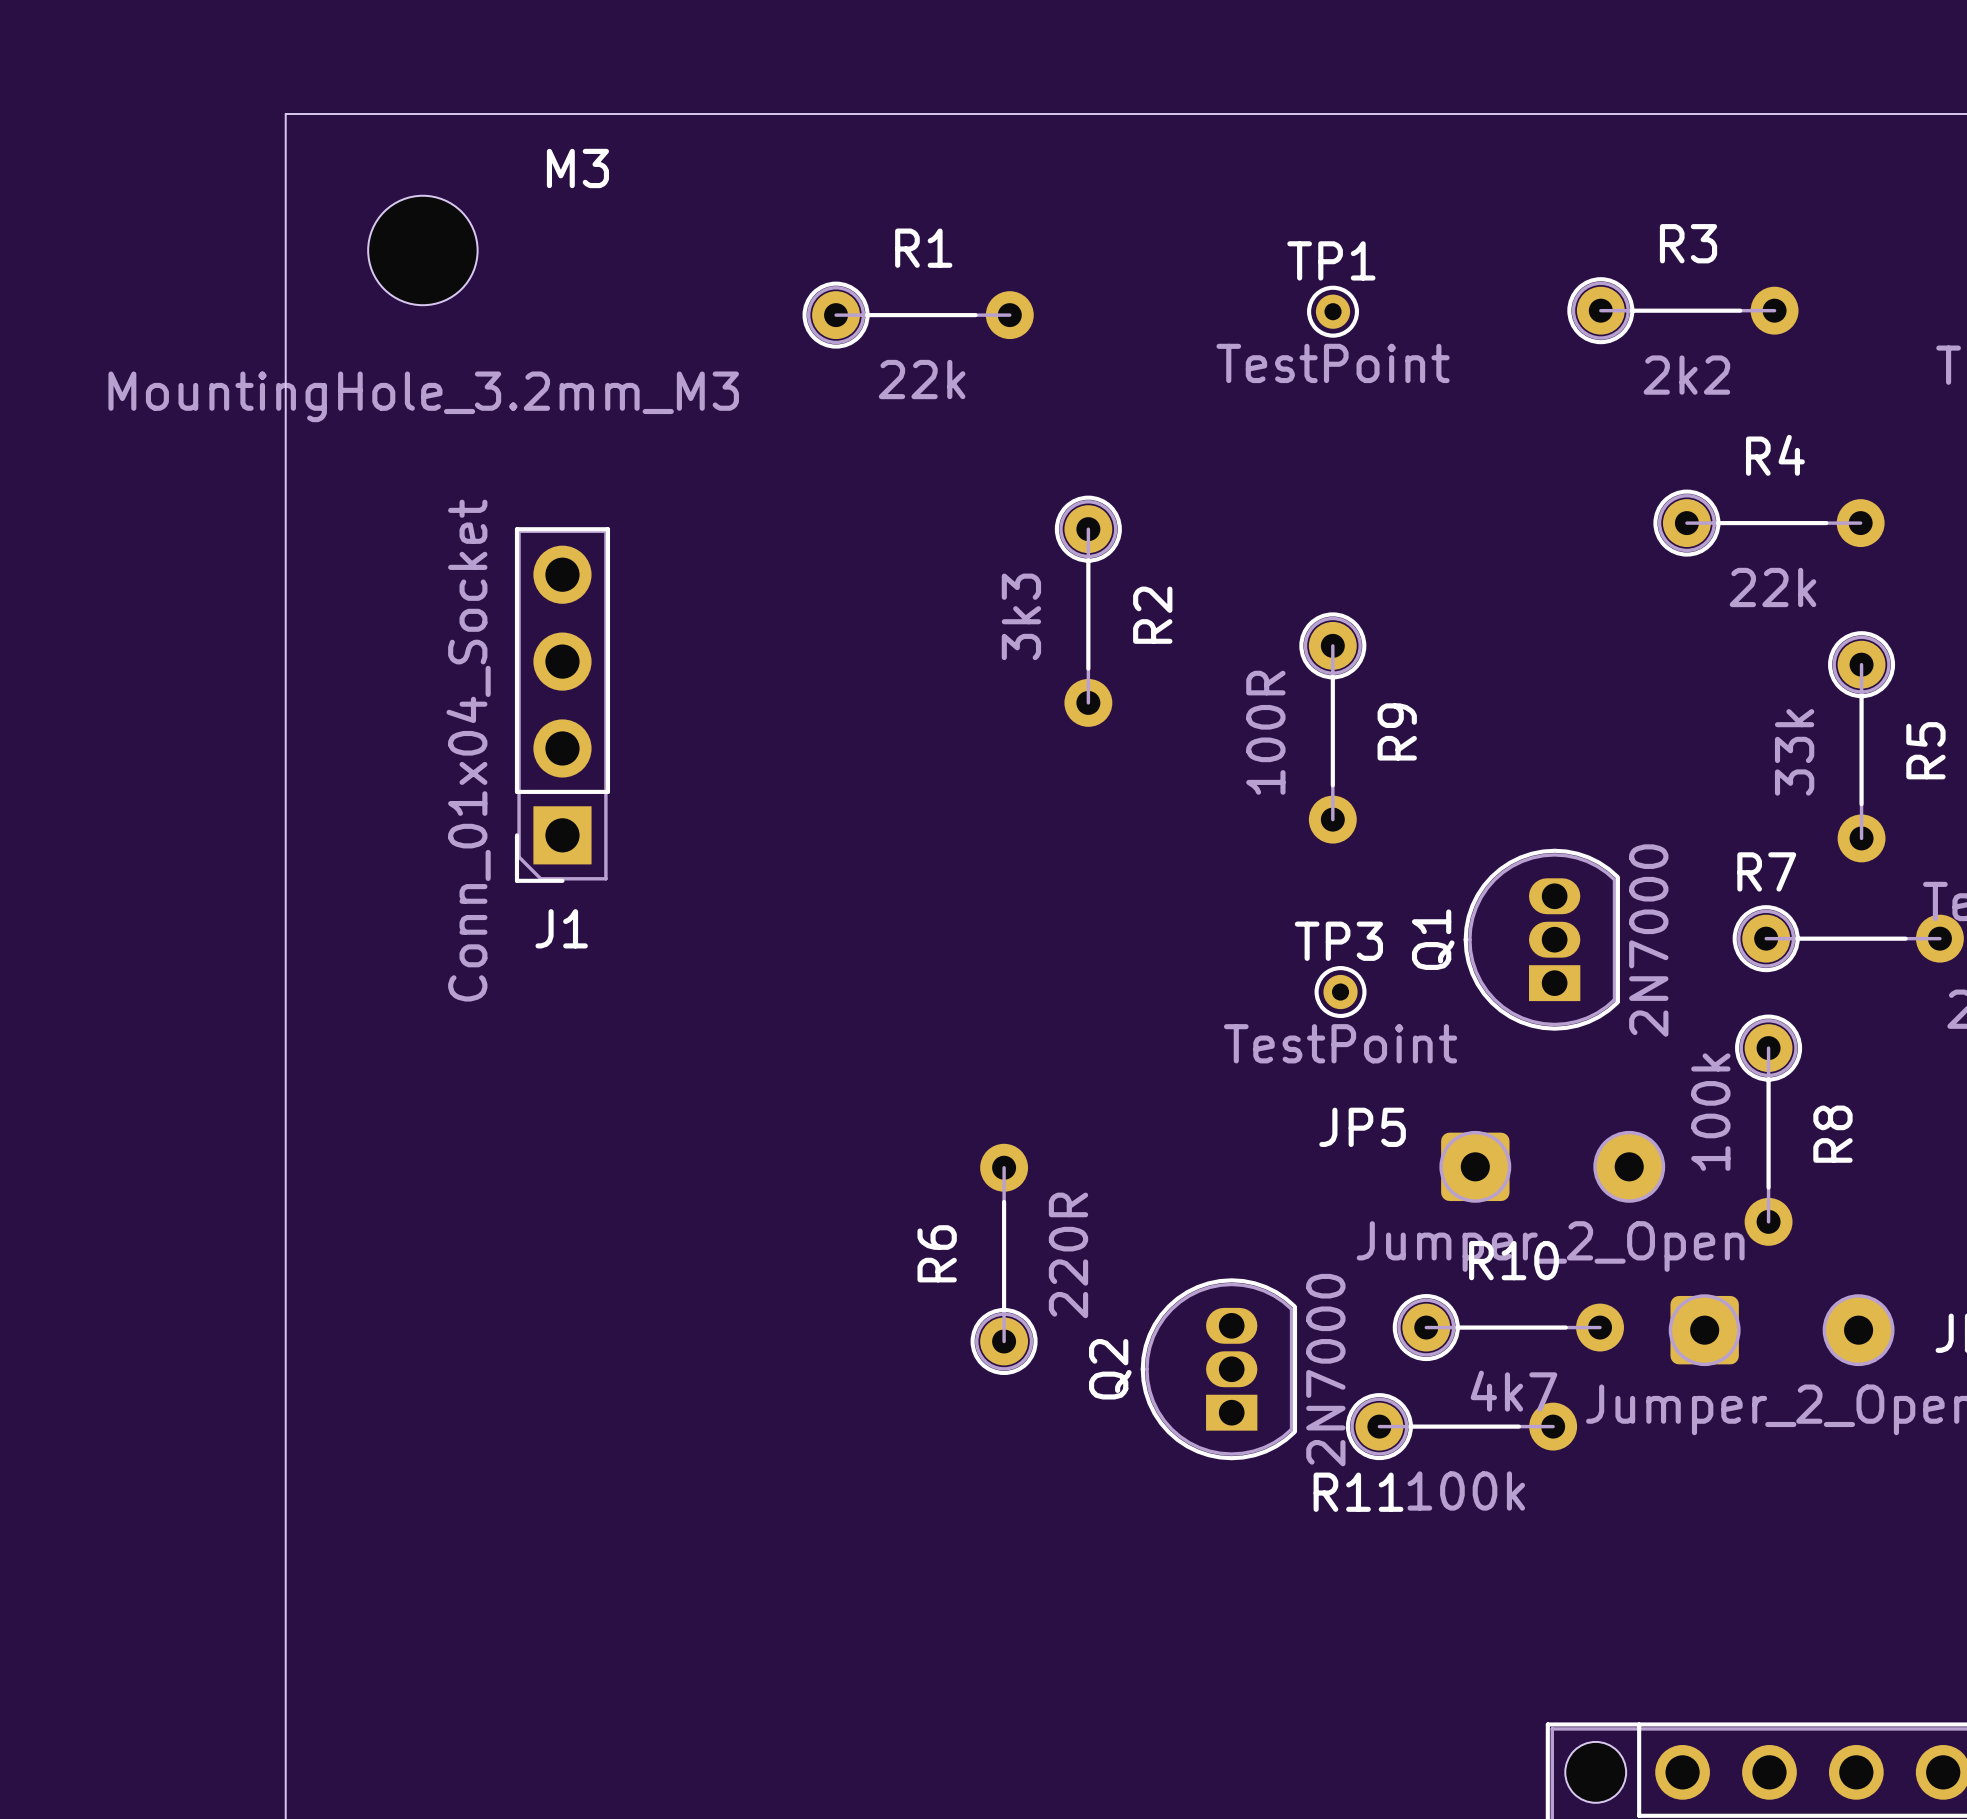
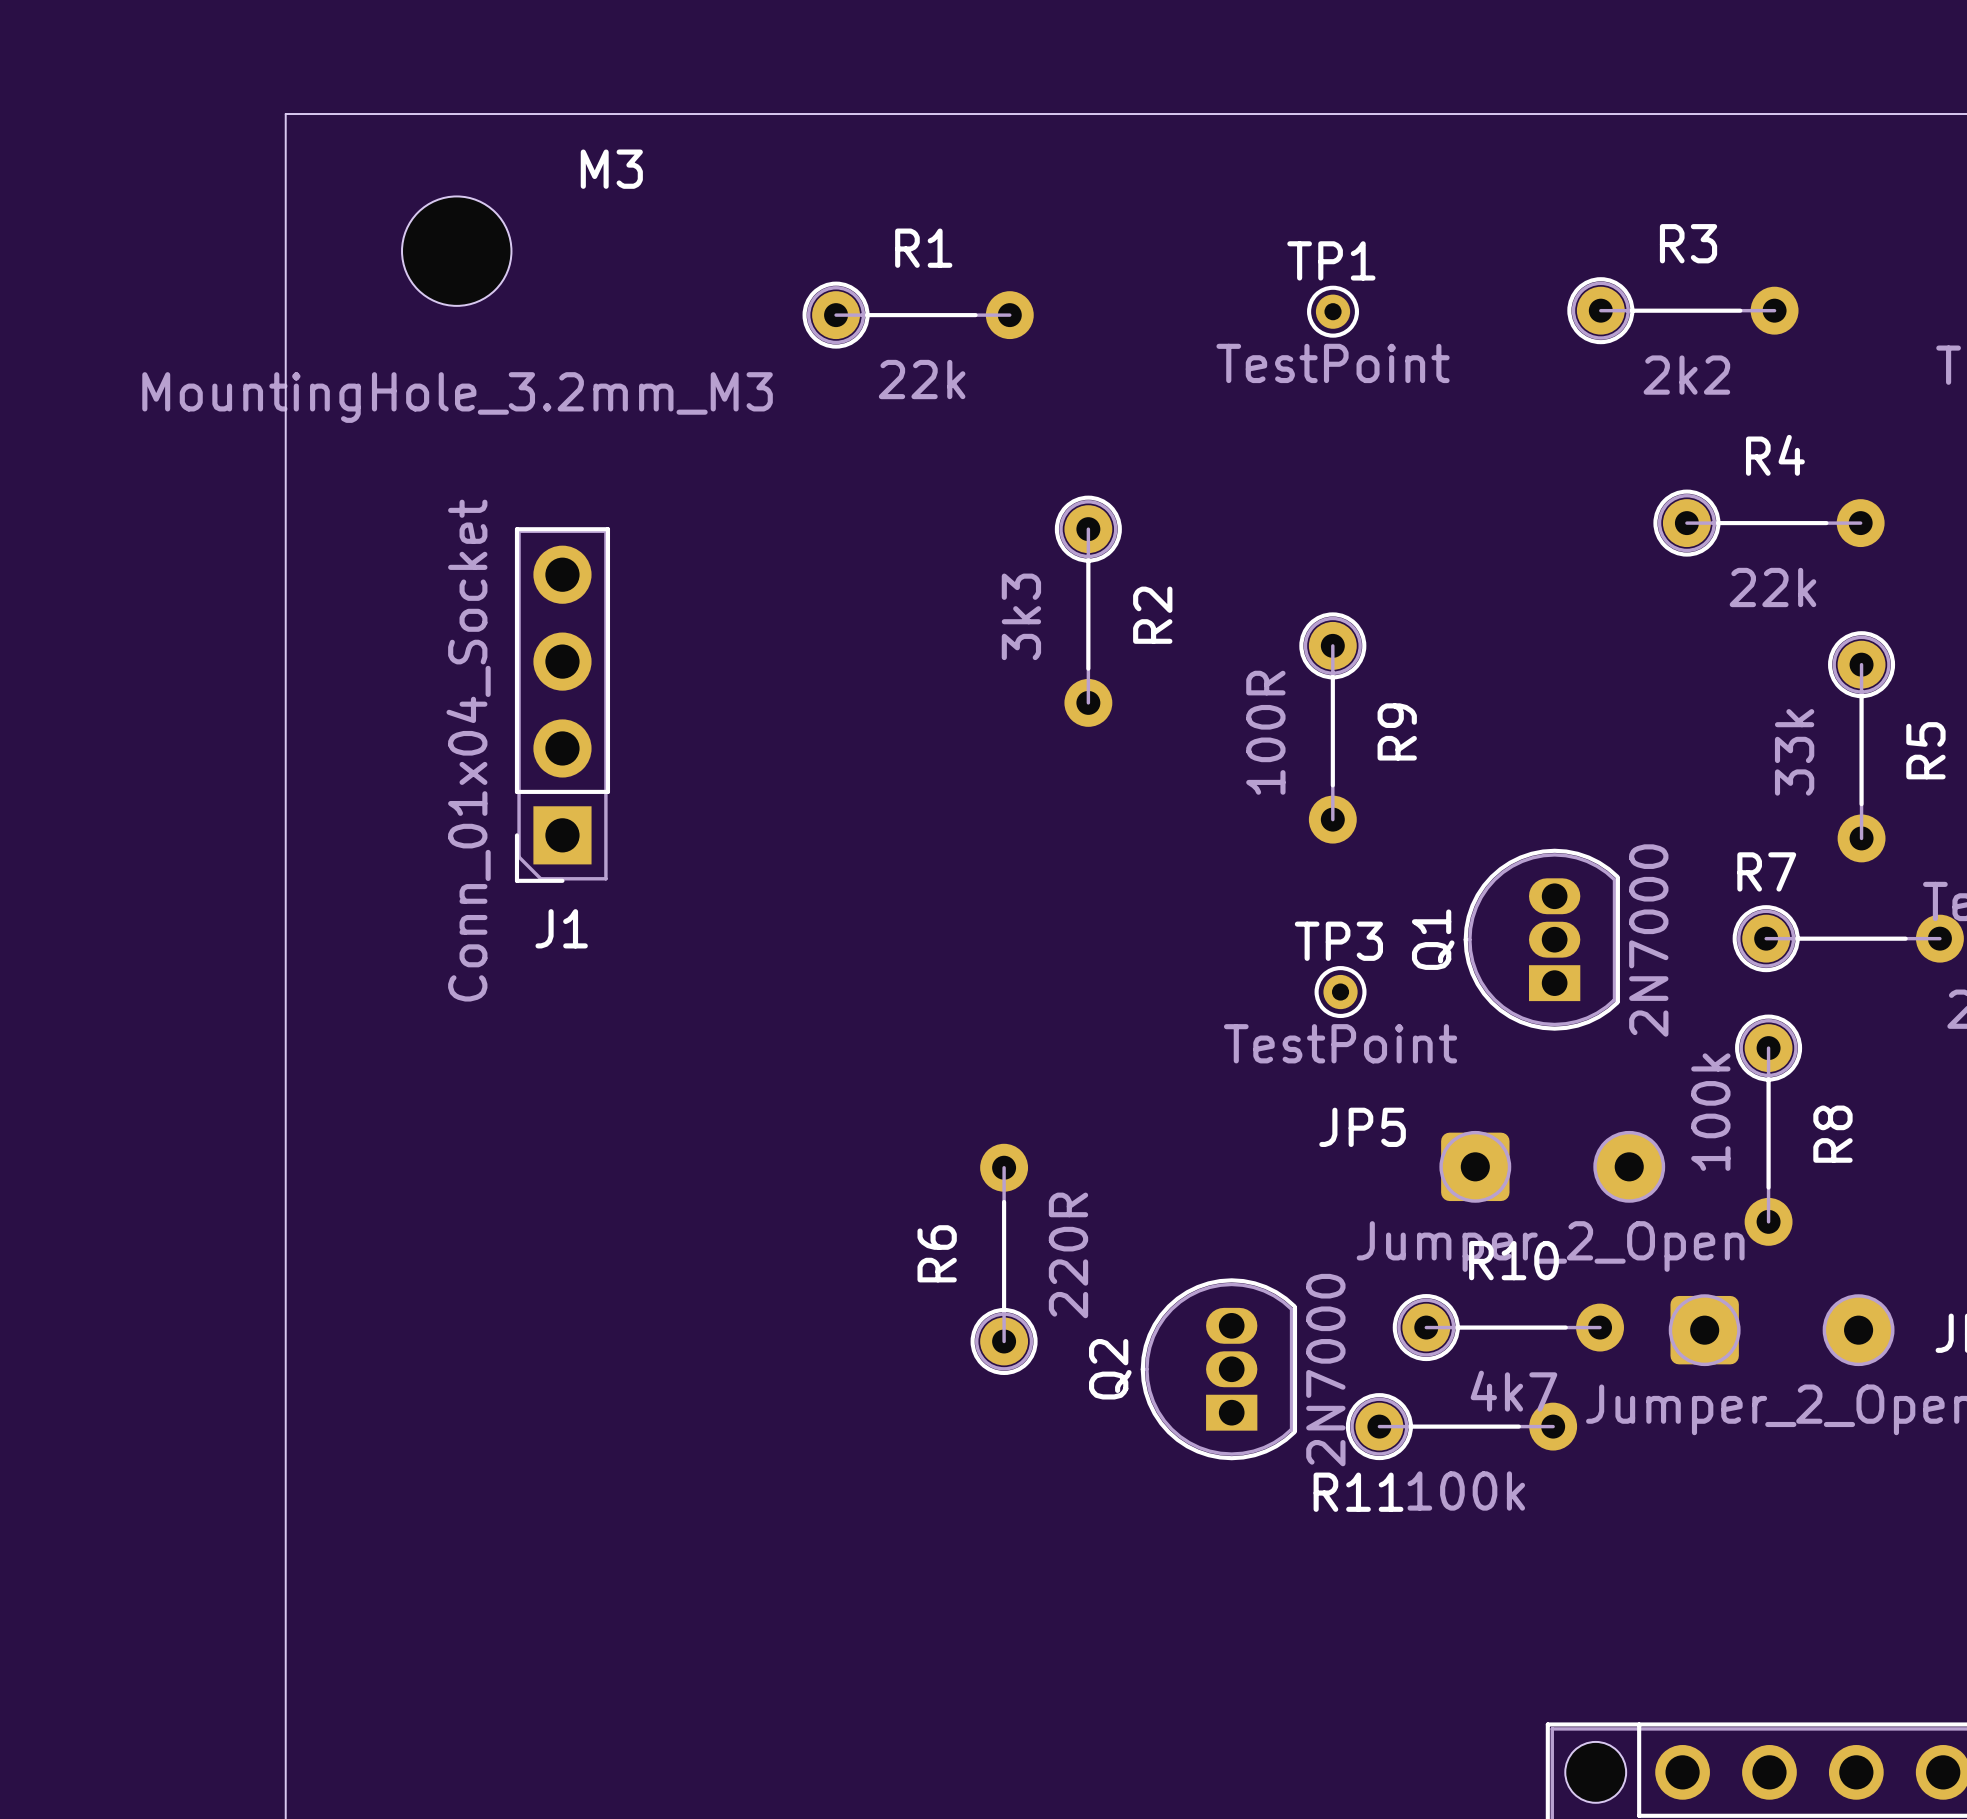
M3 position: (422, 250) -> (456, 251)

